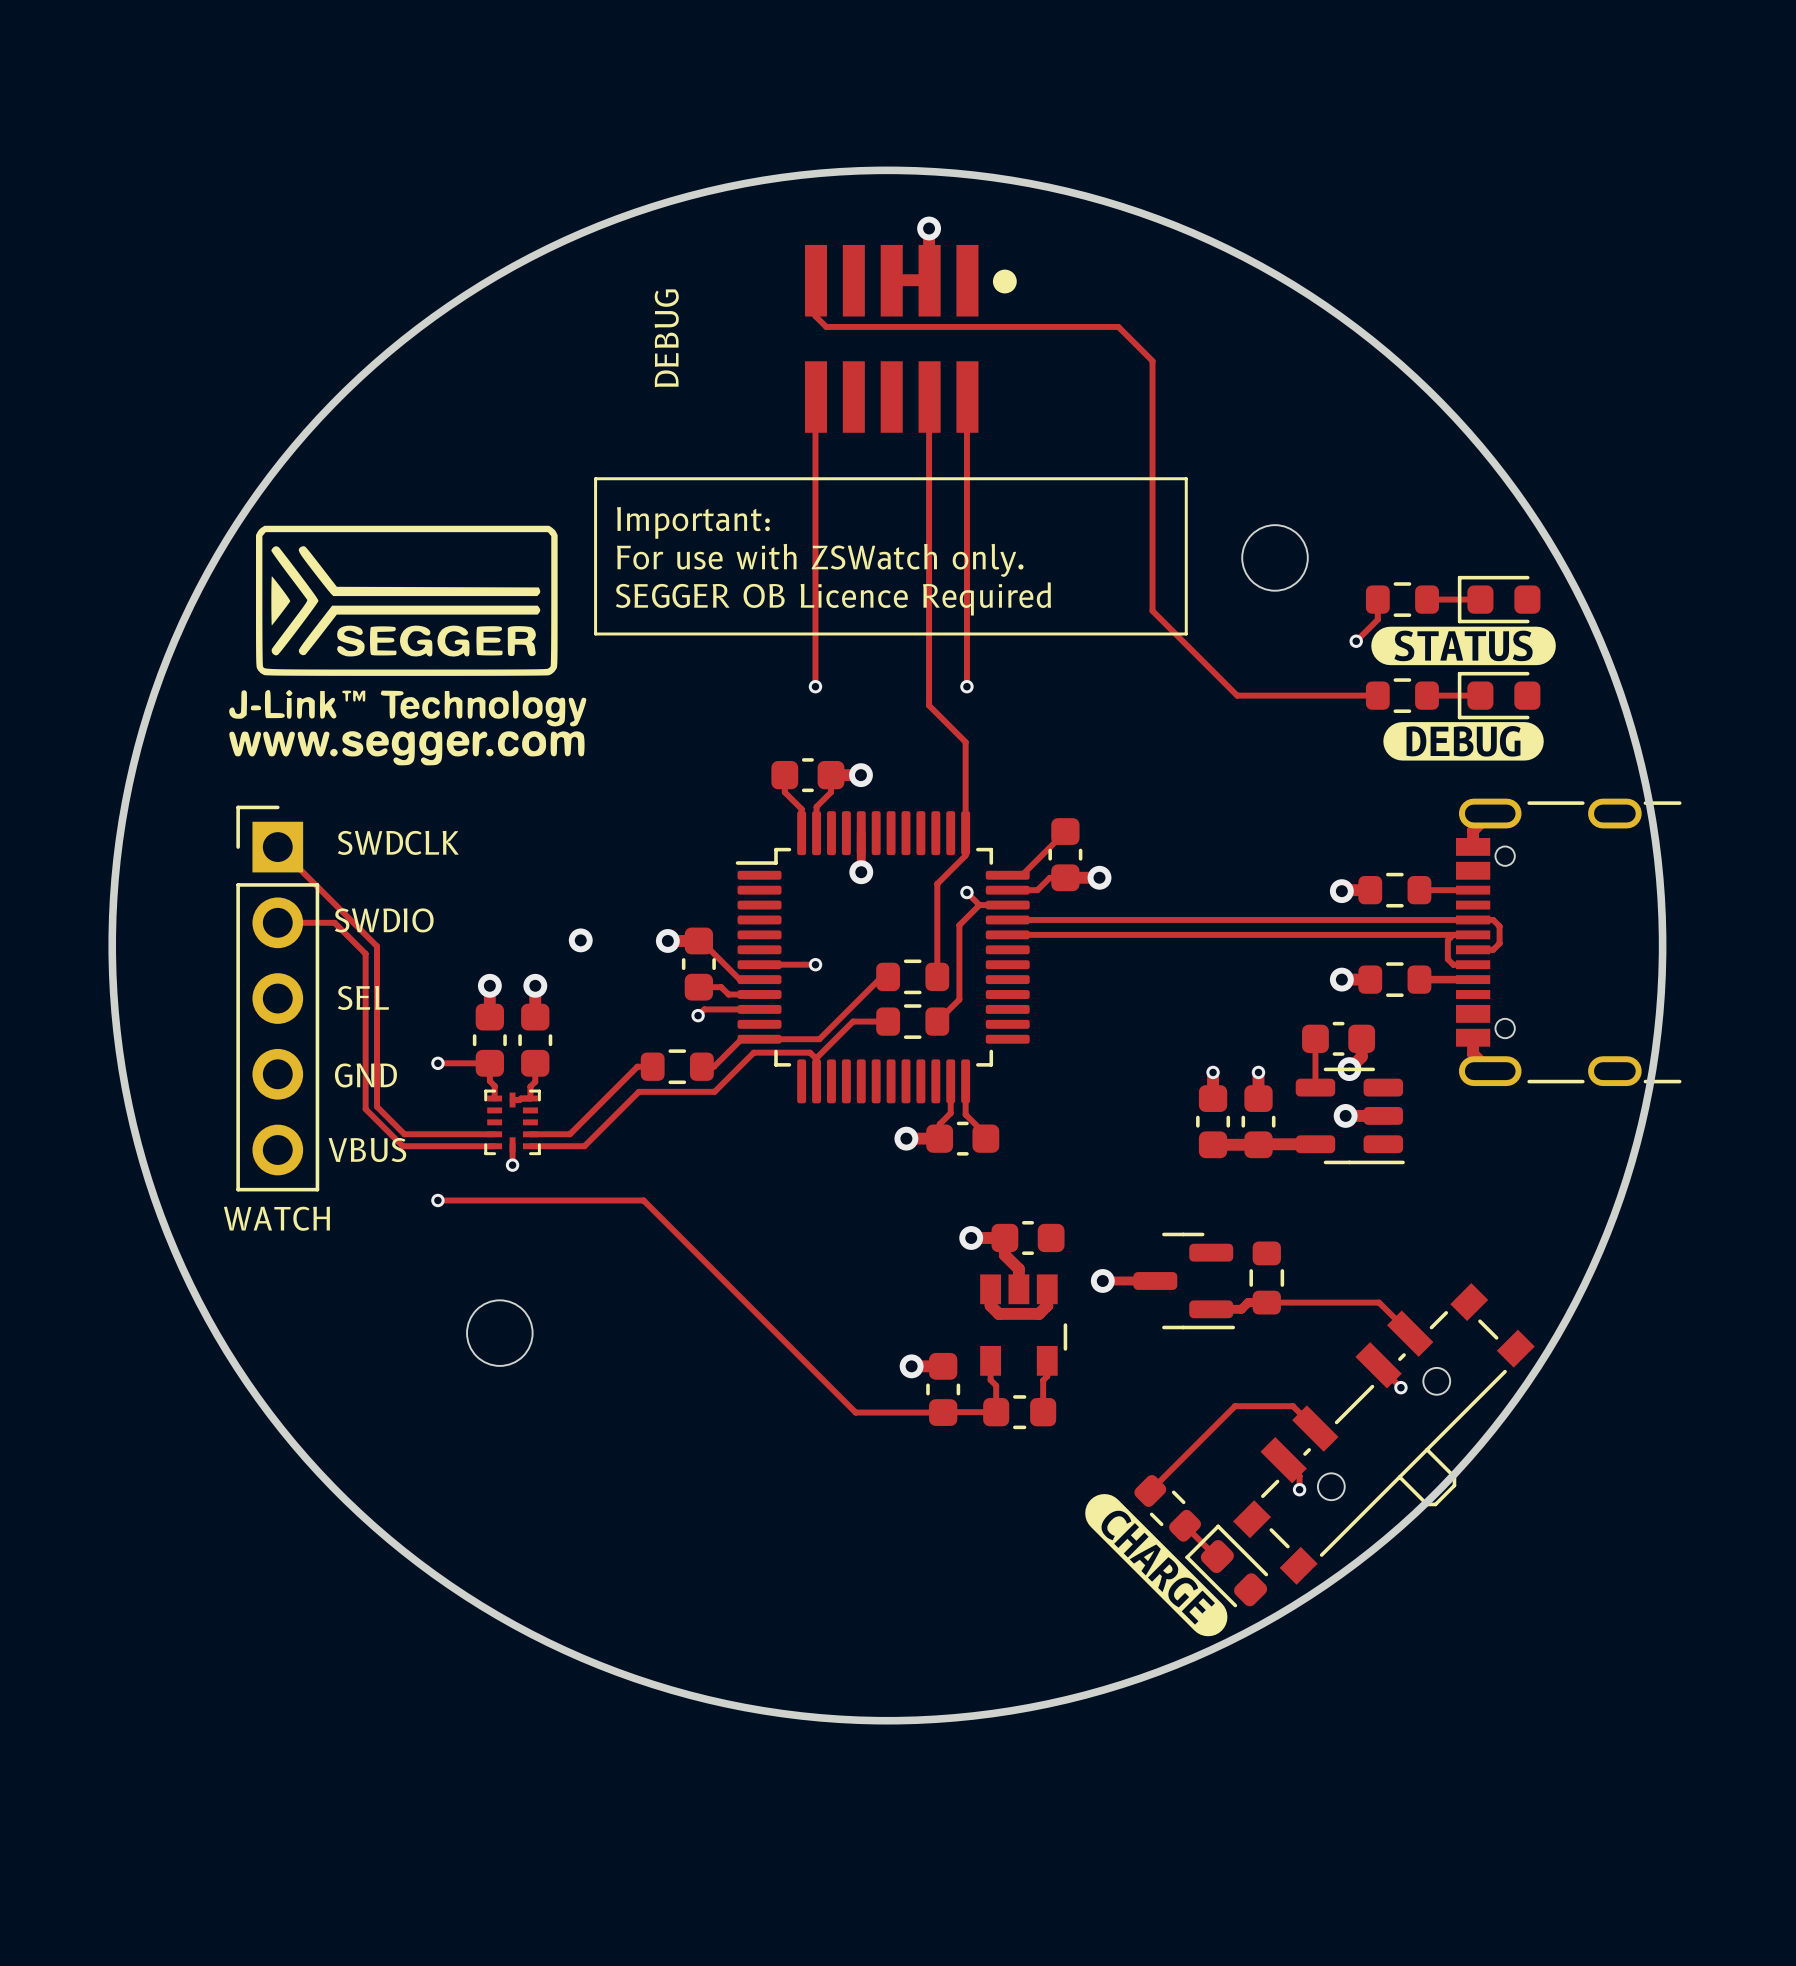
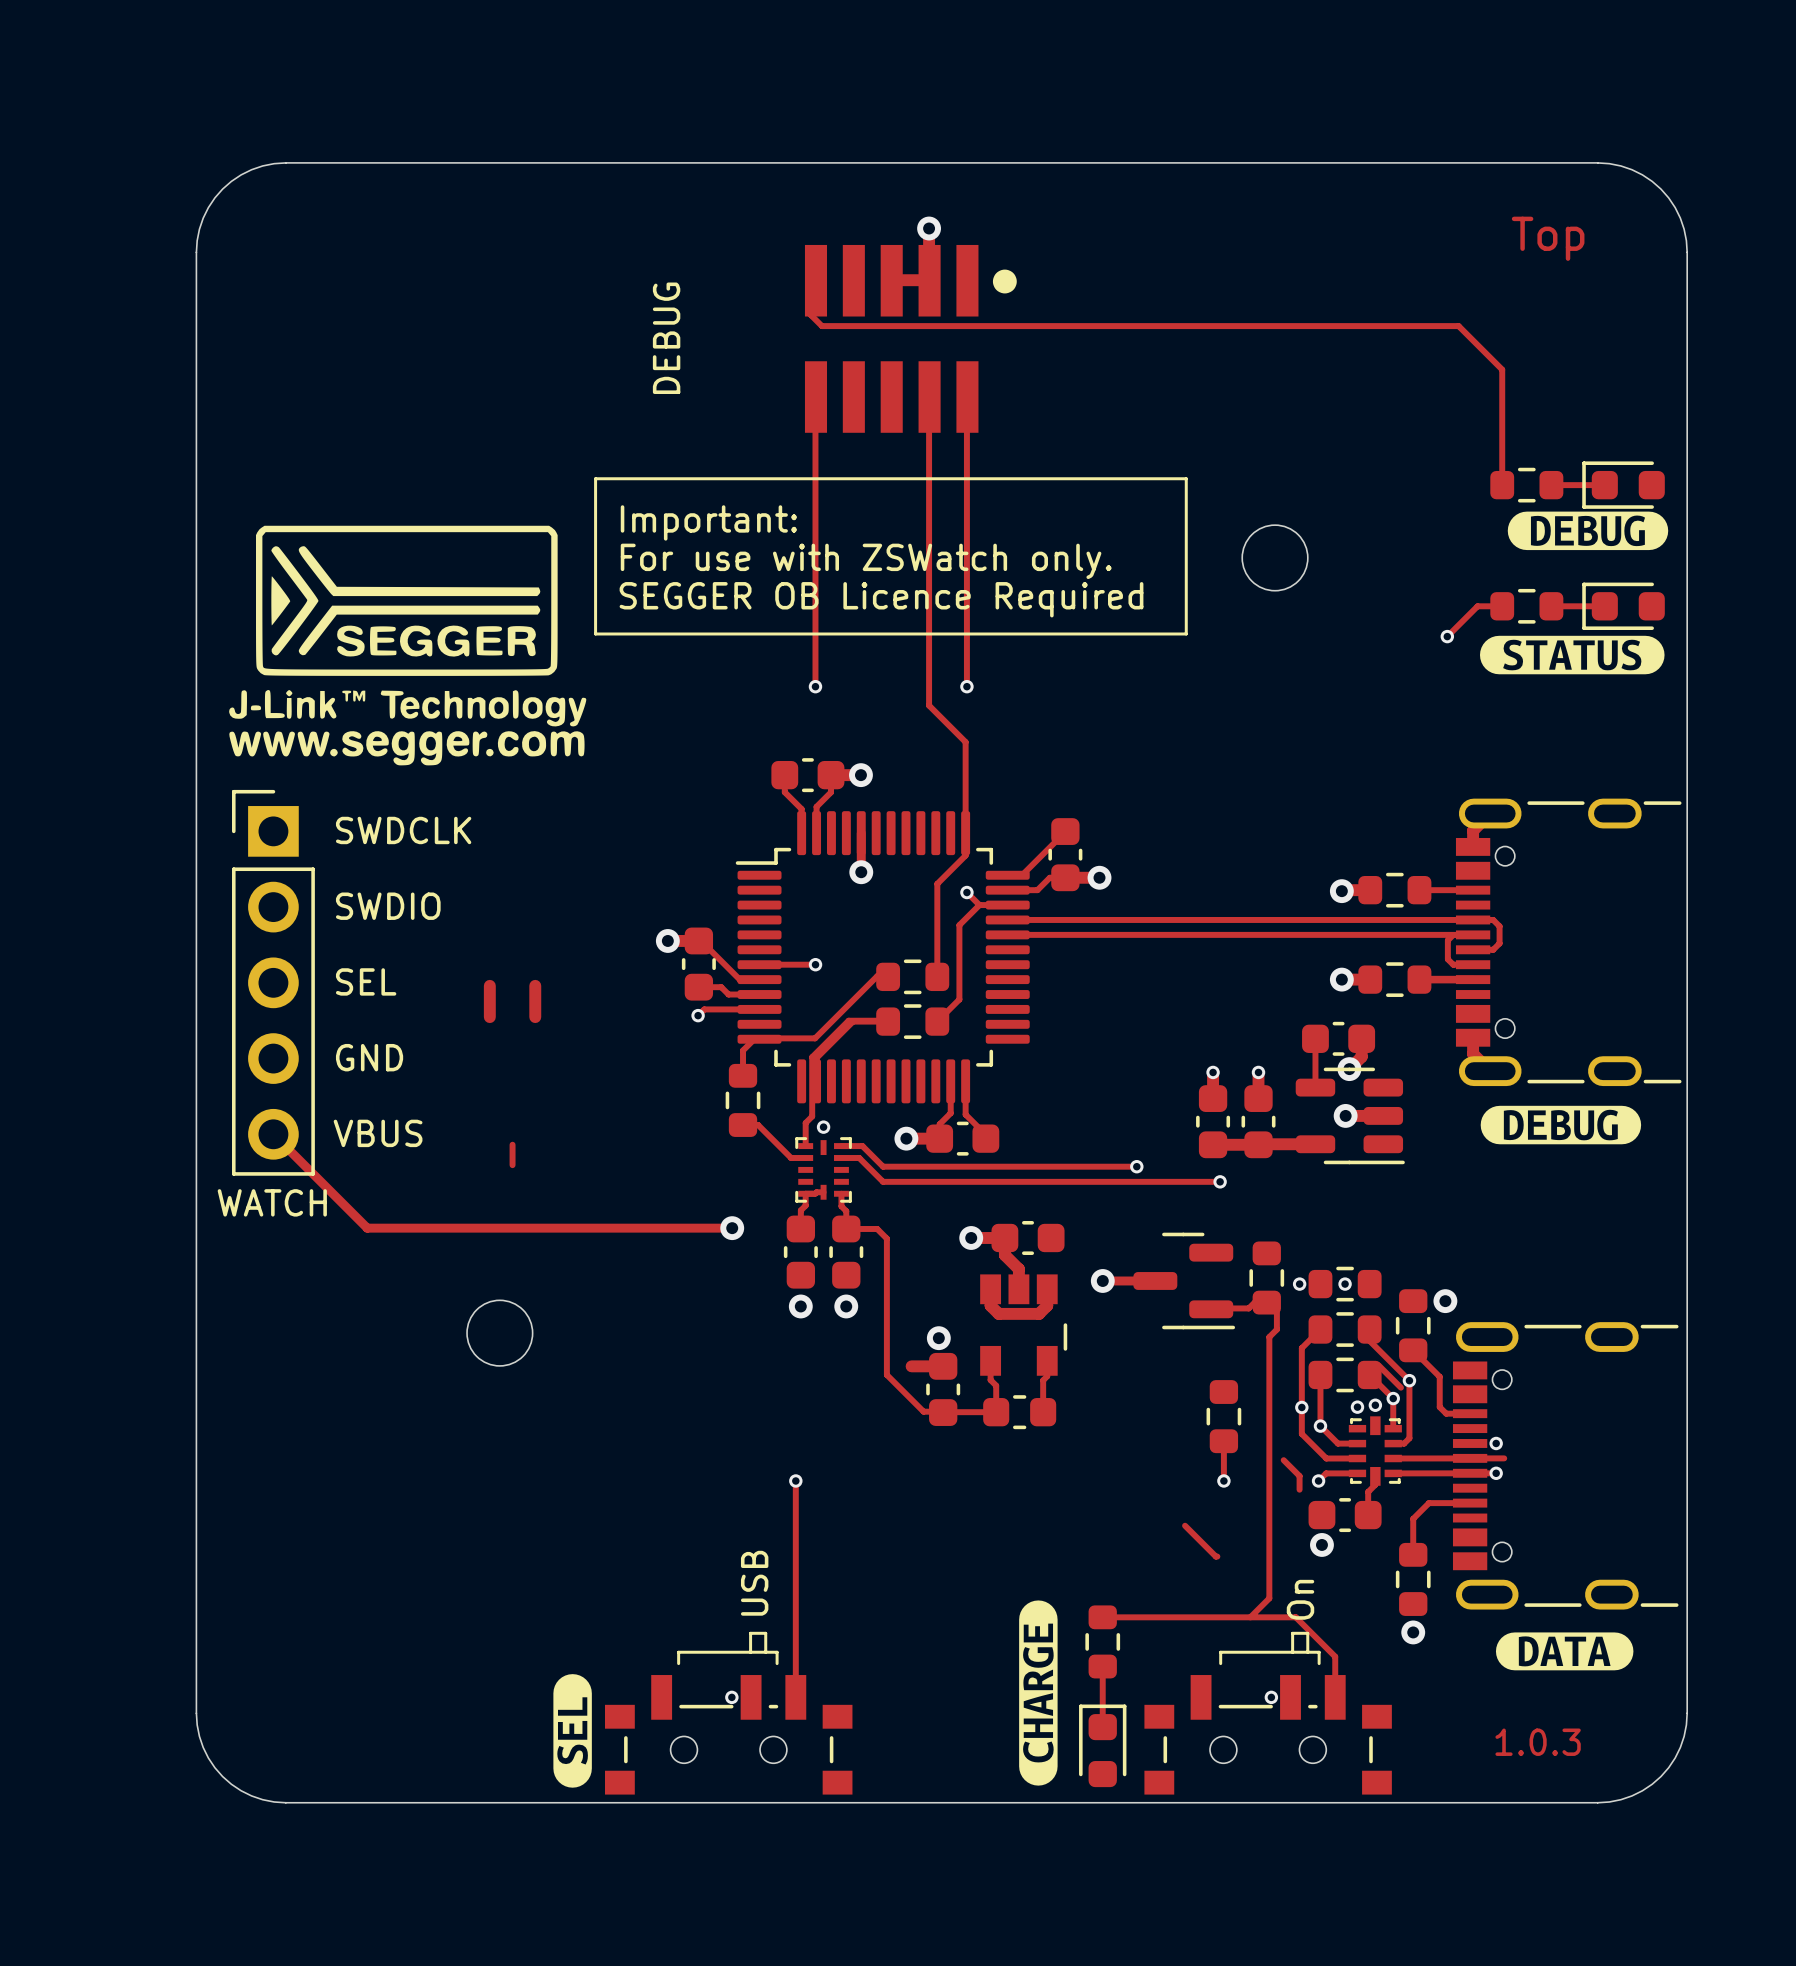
board edge: none -> (285, 162) (1597, 162) (1609, 163) (1631, 169) (1652, 181) (1668, 197) (1680, 218) (1684, 229) (1687, 252) (1687, 1713) (1684, 1736) (1680, 1747) (1668, 1767) (1652, 1784) (1631, 1795) (1620, 1799) (1597, 1802) (285, 1802) (262, 1799) (241, 1790) (222, 1776) (214, 1767) (208, 1758) (199, 1736) (196, 1713) (196, 252) (197, 240) (203, 218) (208, 207) (222, 189) (231, 181) (251, 169) (274, 163) (285, 162)
round board edge: [108, 166, 1667, 1725] -> none
text: none -> Top (1548, 238)
track: none -> (811, 279) (811, 315) (821, 326) (1458, 326) (1502, 369) (1502, 485)
track: (815, 280) (815, 316) (826, 326) (1118, 326) (1152, 361) (1152, 610) (1237, 695) (1377, 695) -> none
part: none -> (1526, 485)
part: none -> (1623, 485)
drawing: none -> [1507, 511, 1669, 551]
part footprint: [1457, 575, 1541, 624] -> [1490, 588, 1564, 624]
track: (1377, 599) (1377, 619) (1356, 641) -> none
part: (1402, 599) -> none
track: (1427, 599) (1480, 599) -> (1551, 606) (1604, 606)
track: none -> (1502, 606) (1477, 606) (1447, 636)
part: none -> (1623, 606)
via position: (1356, 641) -> (1447, 636)
drawing position: (1463, 645) -> (1572, 655)
part: (1402, 695) -> none
track: (1426, 695) (1480, 695) -> (1551, 485) (1604, 485)
part: (1499, 695) -> none
drawing: [1383, 722, 1544, 761] -> none
text position: SWDCLK (398, 842) -> SWDCLK (403, 830)
track: (277, 847) (377, 946) (377, 1106) (404, 1134) (494, 1134) -> none
text position: SWDIO (384, 920) -> SWDIO (388, 906)
track: (277, 922) (334, 922) (365, 953) (365, 1109) (402, 1146) (494, 1146) -> none
via: (580, 940) -> none
track: none -> (883, 976) (877, 976) (815, 1038) (755, 1038) (743, 1050) (743, 1075)
track: (888, 976) (881, 976) (819, 1039) (741, 1039) (714, 1066) (701, 1066) -> none
via: (489, 985) -> none
via: (535, 985) -> none
text position: SEL (363, 997) -> SEL (366, 981)
part position: (277, 998) -> (273, 982)
track: none -> (883, 1020) (848, 1020) (812, 1057) (812, 1116) (805, 1122) (805, 1146)
part: (489, 1040) -> none
part: (535, 1040) -> none
track: (816, 1059) (810, 1052) (753, 1052) (714, 1091) (638, 1091) (584, 1146) (530, 1146) -> none
track: (437, 1063) (489, 1063) (489, 1081) (494, 1085) (494, 1098) -> none
via: (437, 1063) -> none
track: (535, 1063) (535, 1081) (530, 1086) (530, 1098) (512, 1100) -> none
track: (652, 1066) (637, 1066) (569, 1134) (530, 1134) -> none
part rotation: 0° (677, 1066) -> 90° clockwise (743, 1100)
part position: (677, 1066) -> (743, 1100)
text position: GND (365, 1075) -> GND (369, 1057)
drawing: none -> [1480, 1105, 1642, 1145]
part position: (512, 1122) -> (823, 1169)
track: none -> (743, 1125) (758, 1125) (791, 1157) (805, 1157)
via: none -> (823, 1127)
track: none -> (273, 1134) (367, 1228) (732, 1228)
track: none -> (841, 1146) (862, 1146) (883, 1166) (1136, 1166)
text position: VBUS (367, 1150) -> VBUS (378, 1133)
track: none -> (841, 1157) (859, 1157) (883, 1181) (1220, 1181)
via: (512, 1165) -> none
via: none -> (1136, 1166)
via: none -> (1220, 1181)
track: none -> (823, 1192) (805, 1193) (805, 1205) (800, 1210) (800, 1228)
track: none -> (841, 1193) (841, 1206) (846, 1211) (846, 1228) (877, 1228) (886, 1238) (886, 1374) (923, 1411) (938, 1411)
track: (437, 1200) (643, 1200) (855, 1412) (943, 1412) -> none
via: (437, 1200) -> none
via: none -> (732, 1228)
part: none -> (800, 1252)
part: none -> (846, 1252)
part footprint: [1233, 1283, 1535, 1585] -> [1348, 1416, 1402, 1486]
via: none -> (1299, 1284)
part: none -> (1345, 1284)
via: none -> (1345, 1284)
via: none -> (1445, 1301)
via: none -> (800, 1306)
via: none -> (846, 1306)
track: none -> (1221, 1308) (1248, 1308) (1255, 1301) (1276, 1301) (1276, 1329) (1269, 1337) (1269, 1598) (1250, 1617)
track: (1211, 1309) (1241, 1309) (1248, 1302) (1379, 1302) (1410, 1333) -> none
part: none -> (1413, 1325)
track: none -> (1320, 1329) (1301, 1348) (1301, 1433) (1326, 1458) (1357, 1458)
part: none -> (1345, 1329)
track: none -> (1369, 1329) (1369, 1340) (1409, 1380) (1409, 1438) (1404, 1443) (1393, 1443)
track: none -> (1413, 1350) (1439, 1376) (1439, 1407) (1446, 1413) (1470, 1413)
via position: (911, 1366) -> (938, 1338)
track: none -> (1320, 1374) (1320, 1426) (1337, 1443) (1357, 1443)
part: none -> (1345, 1374)
track: none -> (1369, 1374) (1393, 1398) (1393, 1428)
via: none -> (1409, 1380)
via: (1400, 1387) -> none
via: none -> (1393, 1398)
via: none -> (1375, 1405)
via: none -> (1301, 1407)
via: none -> (1357, 1407)
part: none -> (1223, 1416)
via: none -> (1320, 1426)
track: (1315, 1428) (1292, 1406) (1235, 1406) (1150, 1490) -> none
track: none -> (1223, 1441) (1223, 1480)
via: none -> (1496, 1443)
track: none -> (1393, 1458) (1504, 1458)
part: none -> (1565, 1465)
track: none -> (1357, 1473) (1326, 1473) (1318, 1480)
track: none -> (1393, 1473) (1496, 1473)
via: none -> (1496, 1473)
track: none -> (1375, 1476) (1375, 1484) (1368, 1491) (1368, 1515)
via: none -> (795, 1480)
via: none -> (1223, 1480)
track: none -> (795, 1481) (795, 1697)
via position: (1299, 1489) -> (1318, 1480)
drawing: [1085, 1494, 1228, 1637] -> none
track: none -> (1470, 1503) (1428, 1503) (1413, 1518) (1413, 1554)
part: (1167, 1508) -> none
part: none -> (1345, 1515)
via: none -> (1321, 1544)
part: (1226, 1565) -> none
part: none -> (1413, 1579)
text: none -> USB (754, 1583)
drawing: none -> [1019, 1600, 1058, 1786]
text: none -> On (1300, 1599)
track: none -> (1102, 1617) (1295, 1617) (1335, 1656) (1335, 1701)
via: none -> (1413, 1632)
drawing: none -> [1495, 1632, 1634, 1671]
part: none -> (1102, 1641)
line: none -> (750, 1652) (750, 1633) (765, 1633) (765, 1652)
line: none -> (1292, 1652) (1292, 1633) (1307, 1633) (1307, 1652)
line: none -> (678, 1663) (678, 1652) (777, 1652) (777, 1663)
line: none -> (1220, 1663) (1220, 1652) (1319, 1652) (1319, 1663)
track: none -> (1102, 1666) (1102, 1727)
drawing: none -> [553, 1674, 592, 1788]
via: none -> (731, 1697)
via: none -> (1271, 1697)
part: none -> (728, 1734)
part: none -> (1268, 1734)
text: none -> 1.0.3 (1538, 1742)
part: none -> (1102, 1745)

